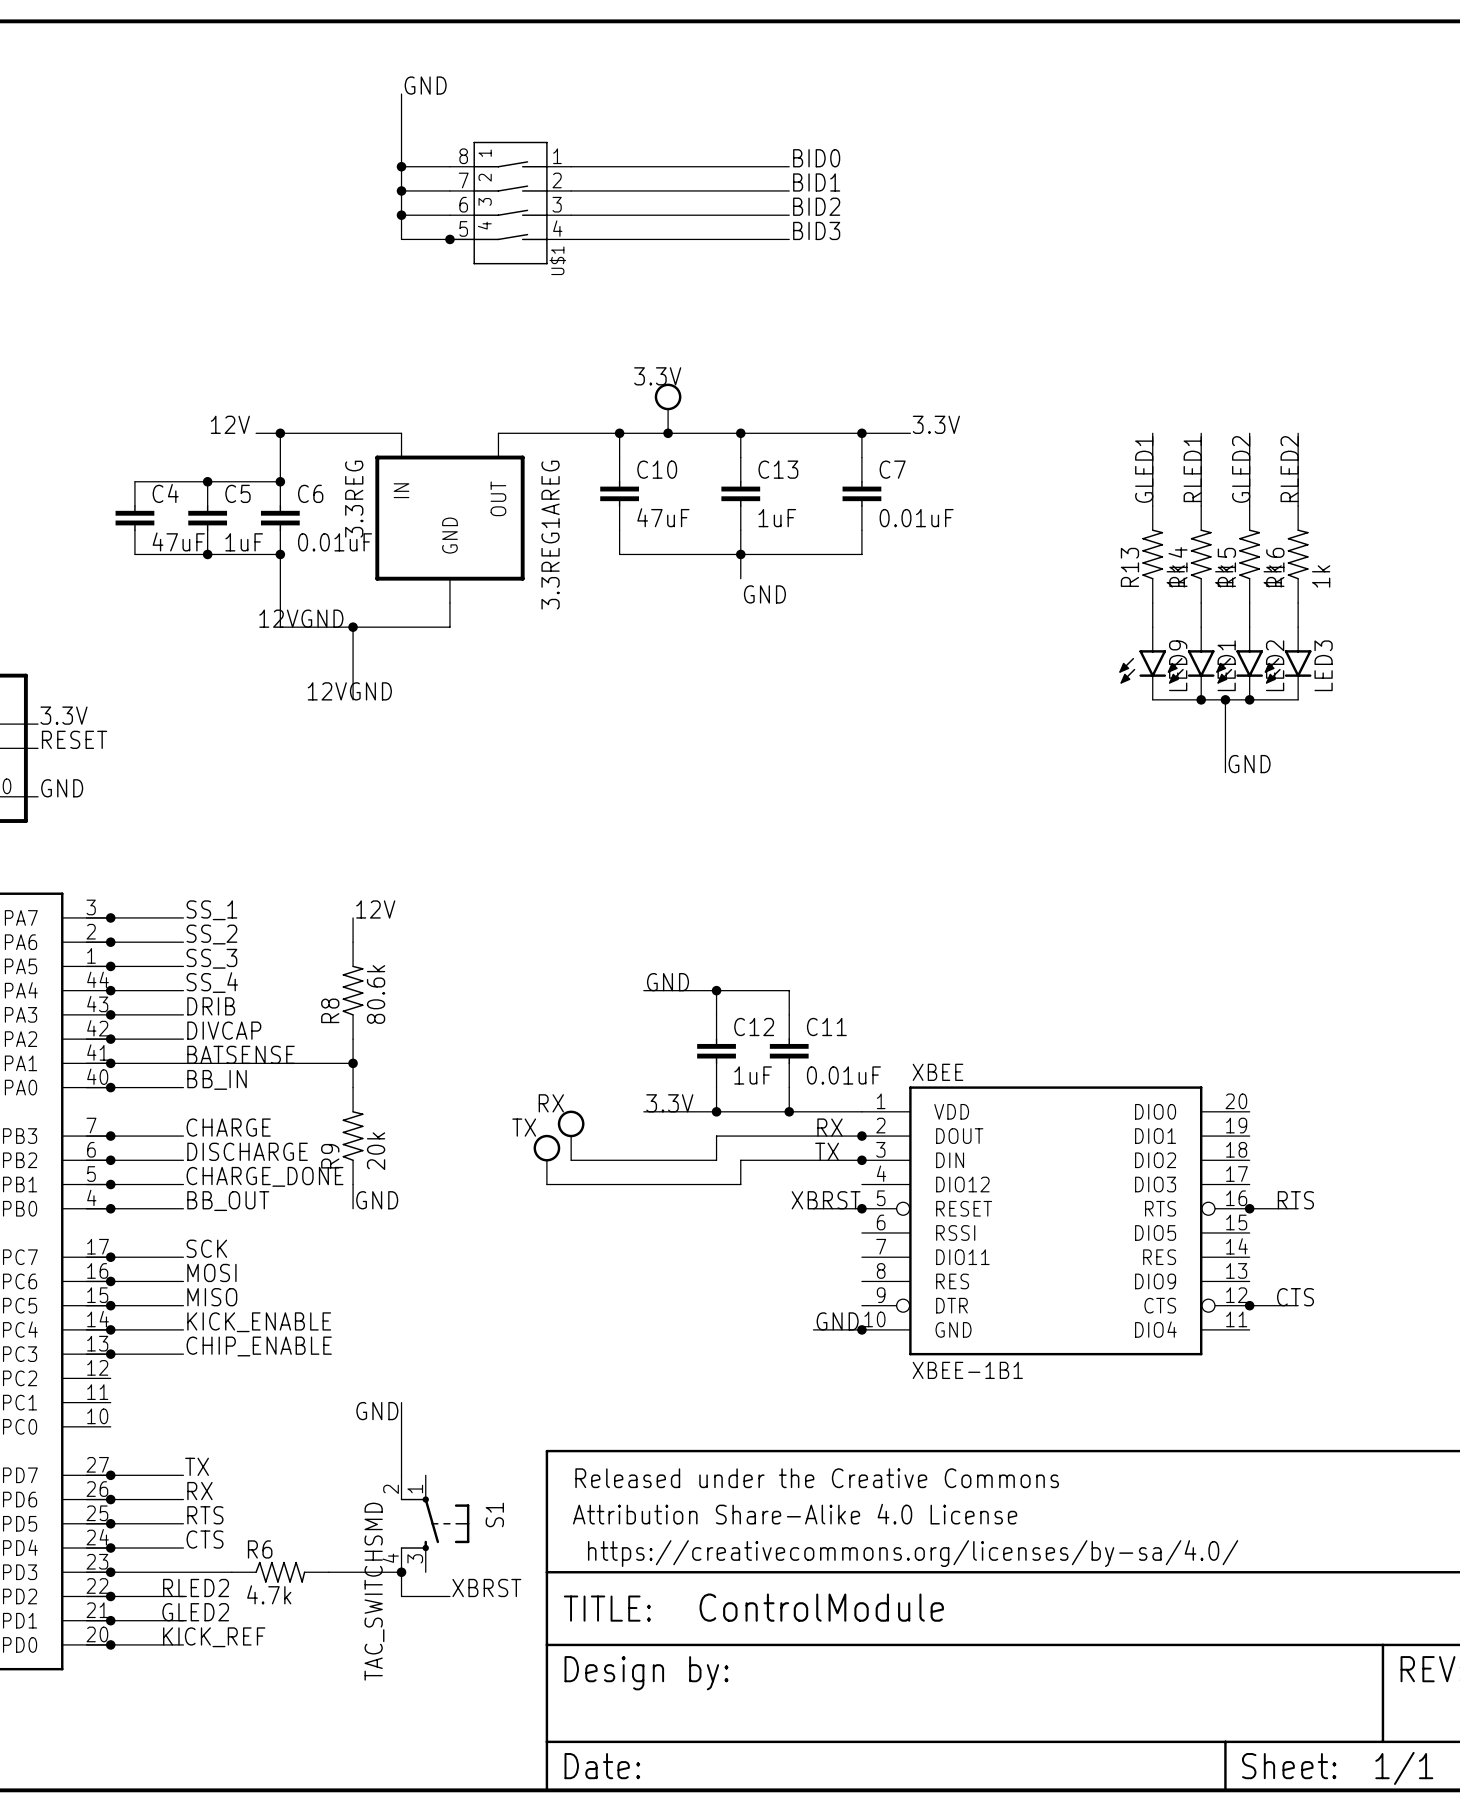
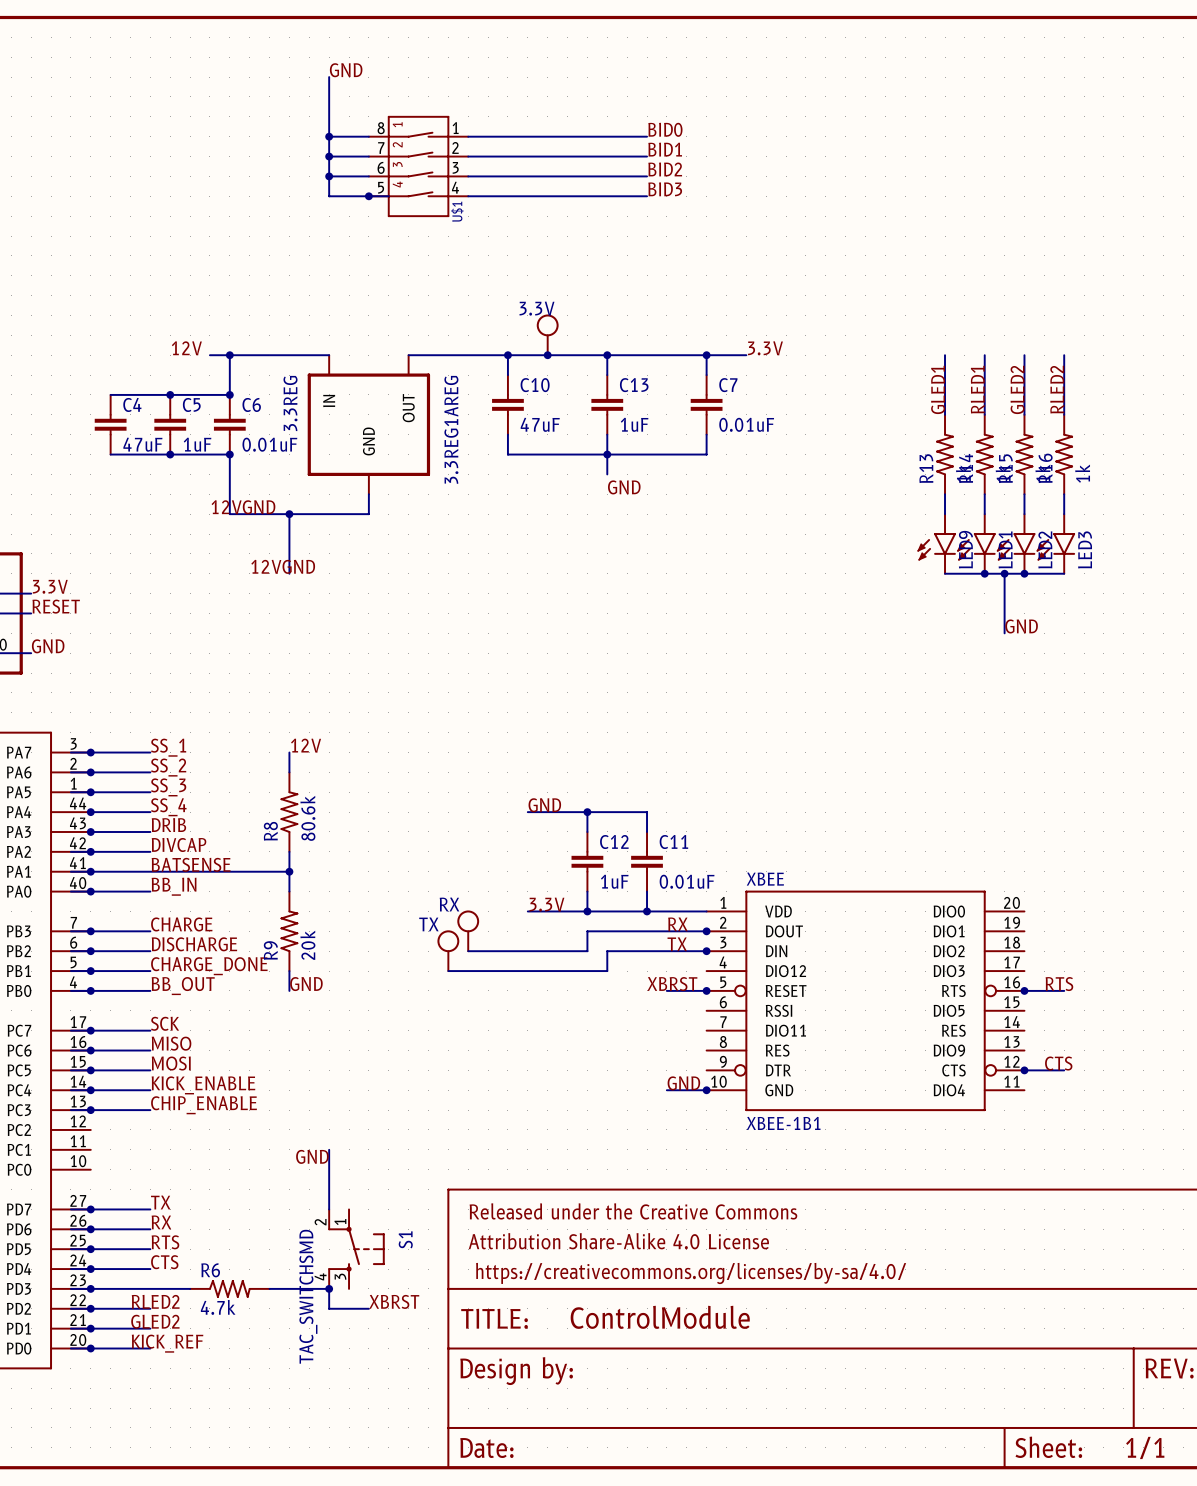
label: MOSI (211, 1272) -> MISO (171, 1043)
label: MISO (212, 1297) -> MOSI (171, 1063)

